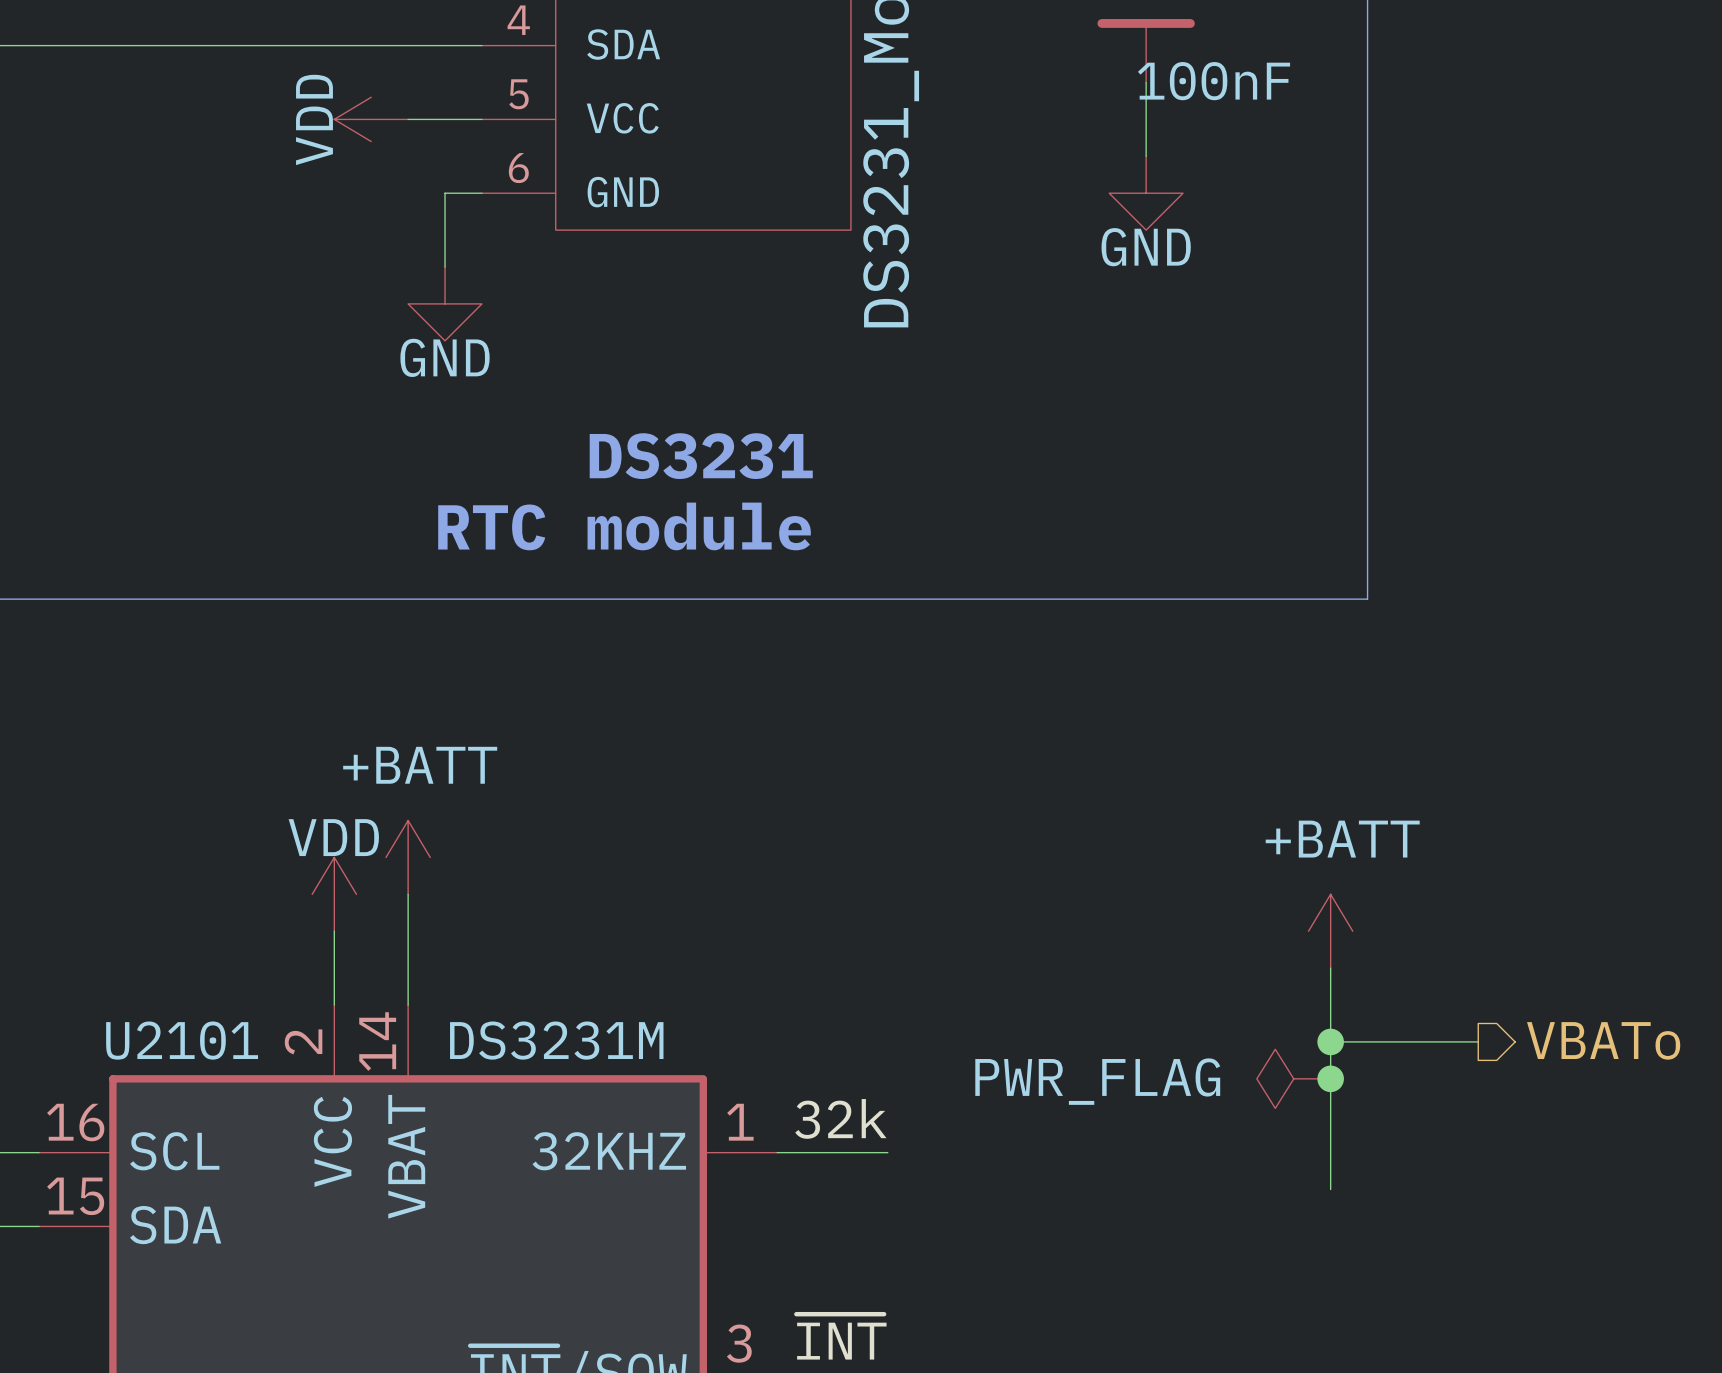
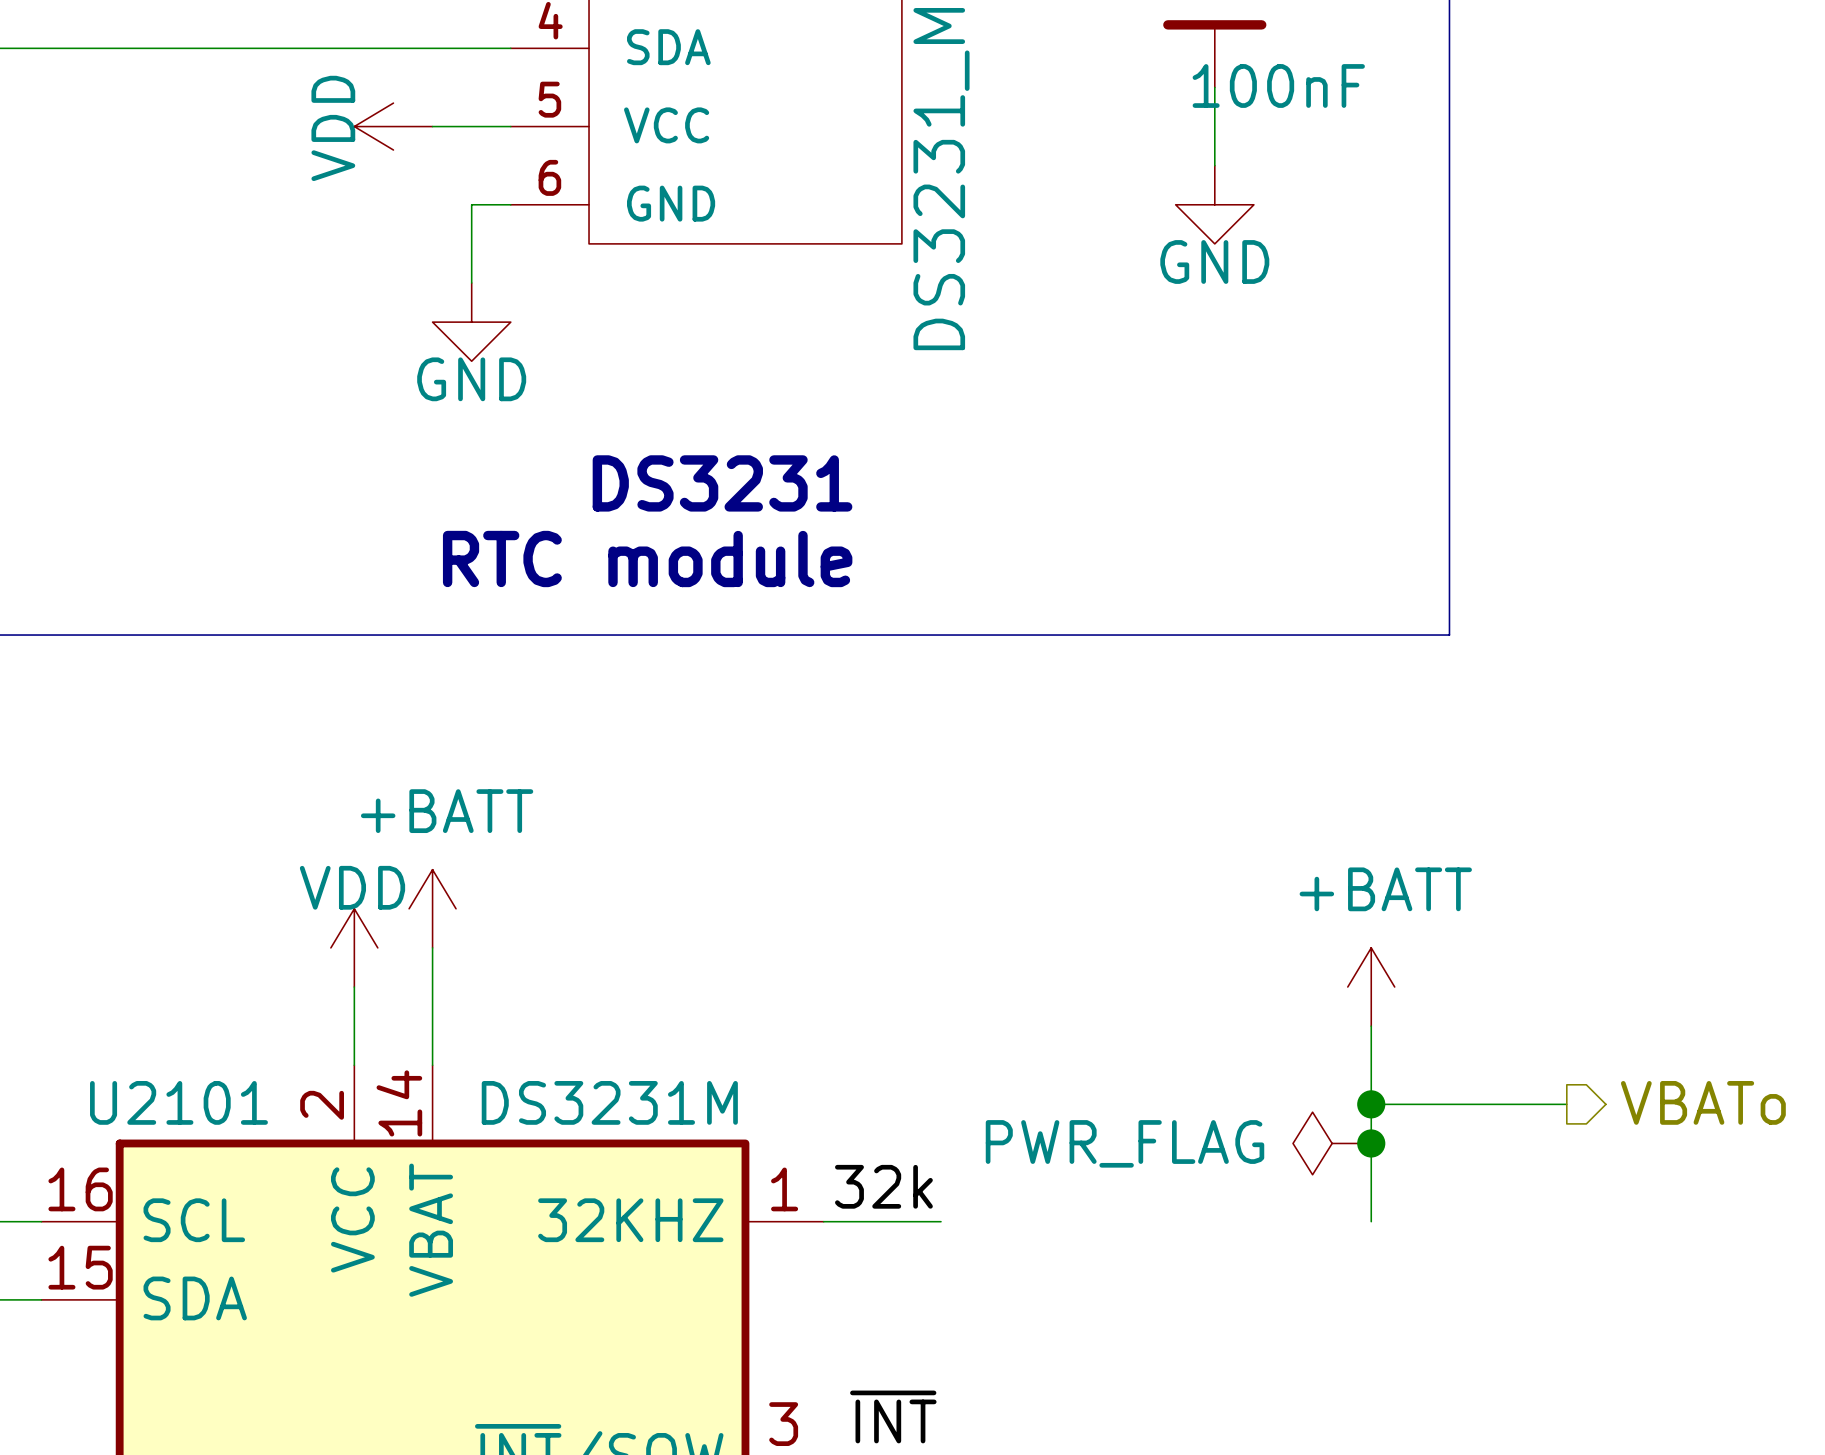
power symbol position: +BATT (1330, 931) -> +BATT (1371, 987)
wire: none -> (1371, 1026) (1371, 1221)
wire: (1330, 968) (1330, 1189) -> none
wire: none -> (1371, 1104) (1410, 1104)
junction: none -> (1371, 1104)
junction: (1330, 1041) -> none
junction: none -> (1371, 1143)
power symbol position: PWR_FLAG (1293, 1078) -> PWR_FLAG (1332, 1143)
junction: (1330, 1078) -> none

